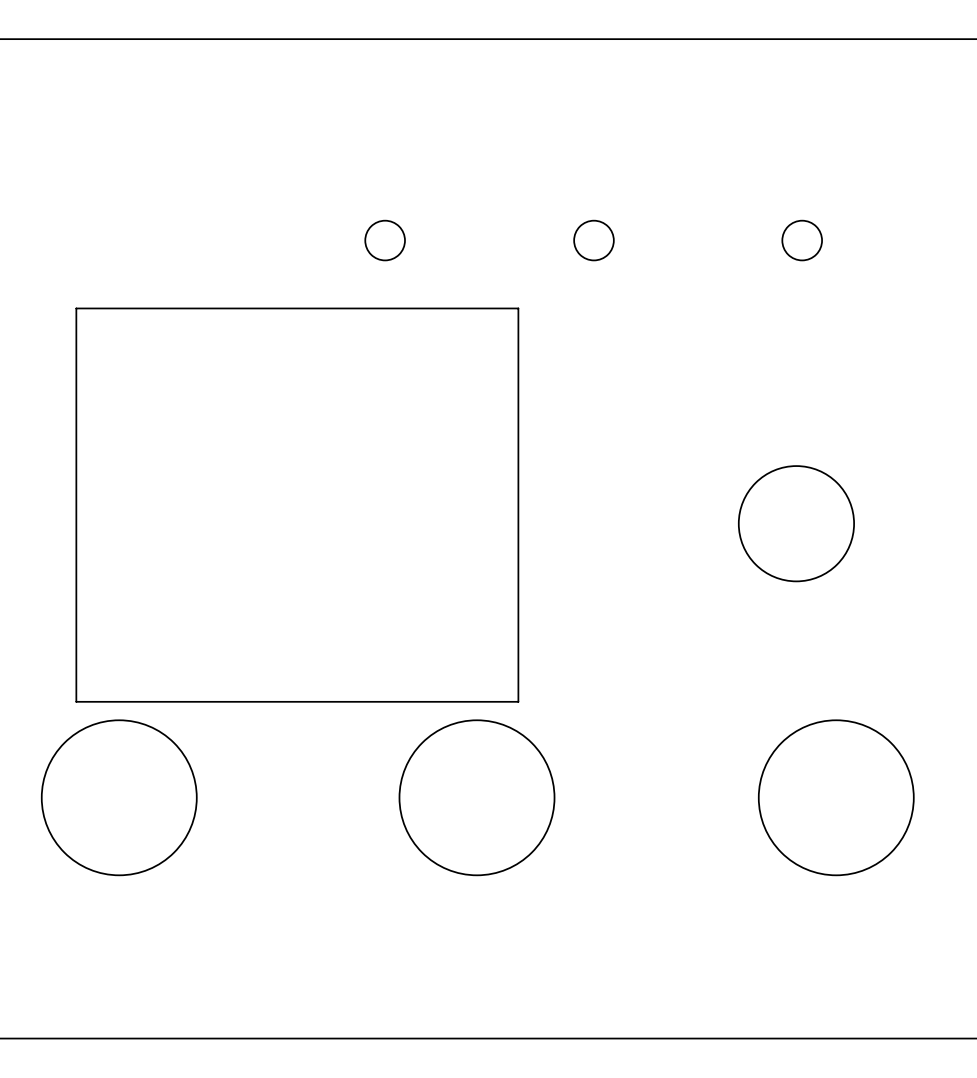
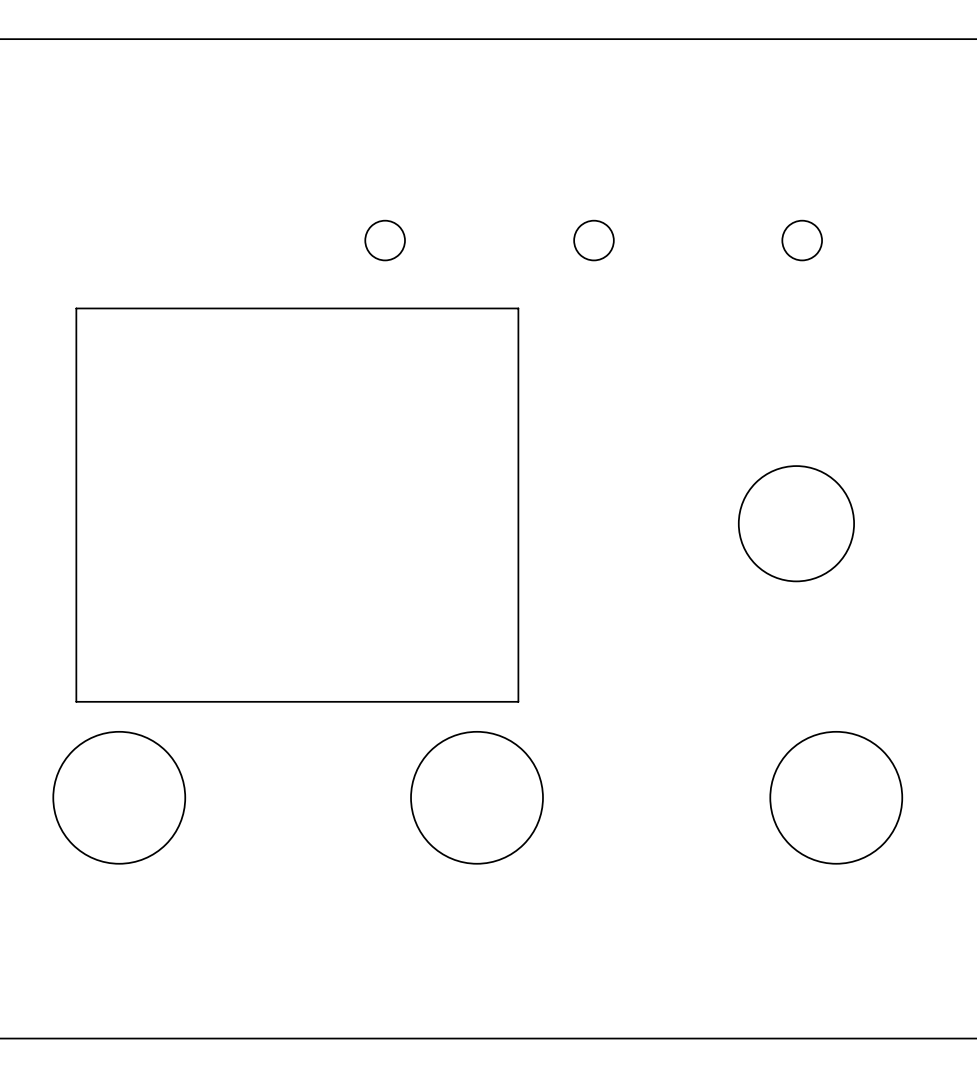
round board edge size: [41, 719, 198, 876] -> [52, 731, 186, 865]
round board edge size: [399, 719, 555, 876] -> [410, 731, 544, 865]
round board edge size: [758, 719, 915, 876] -> [769, 731, 903, 865]

